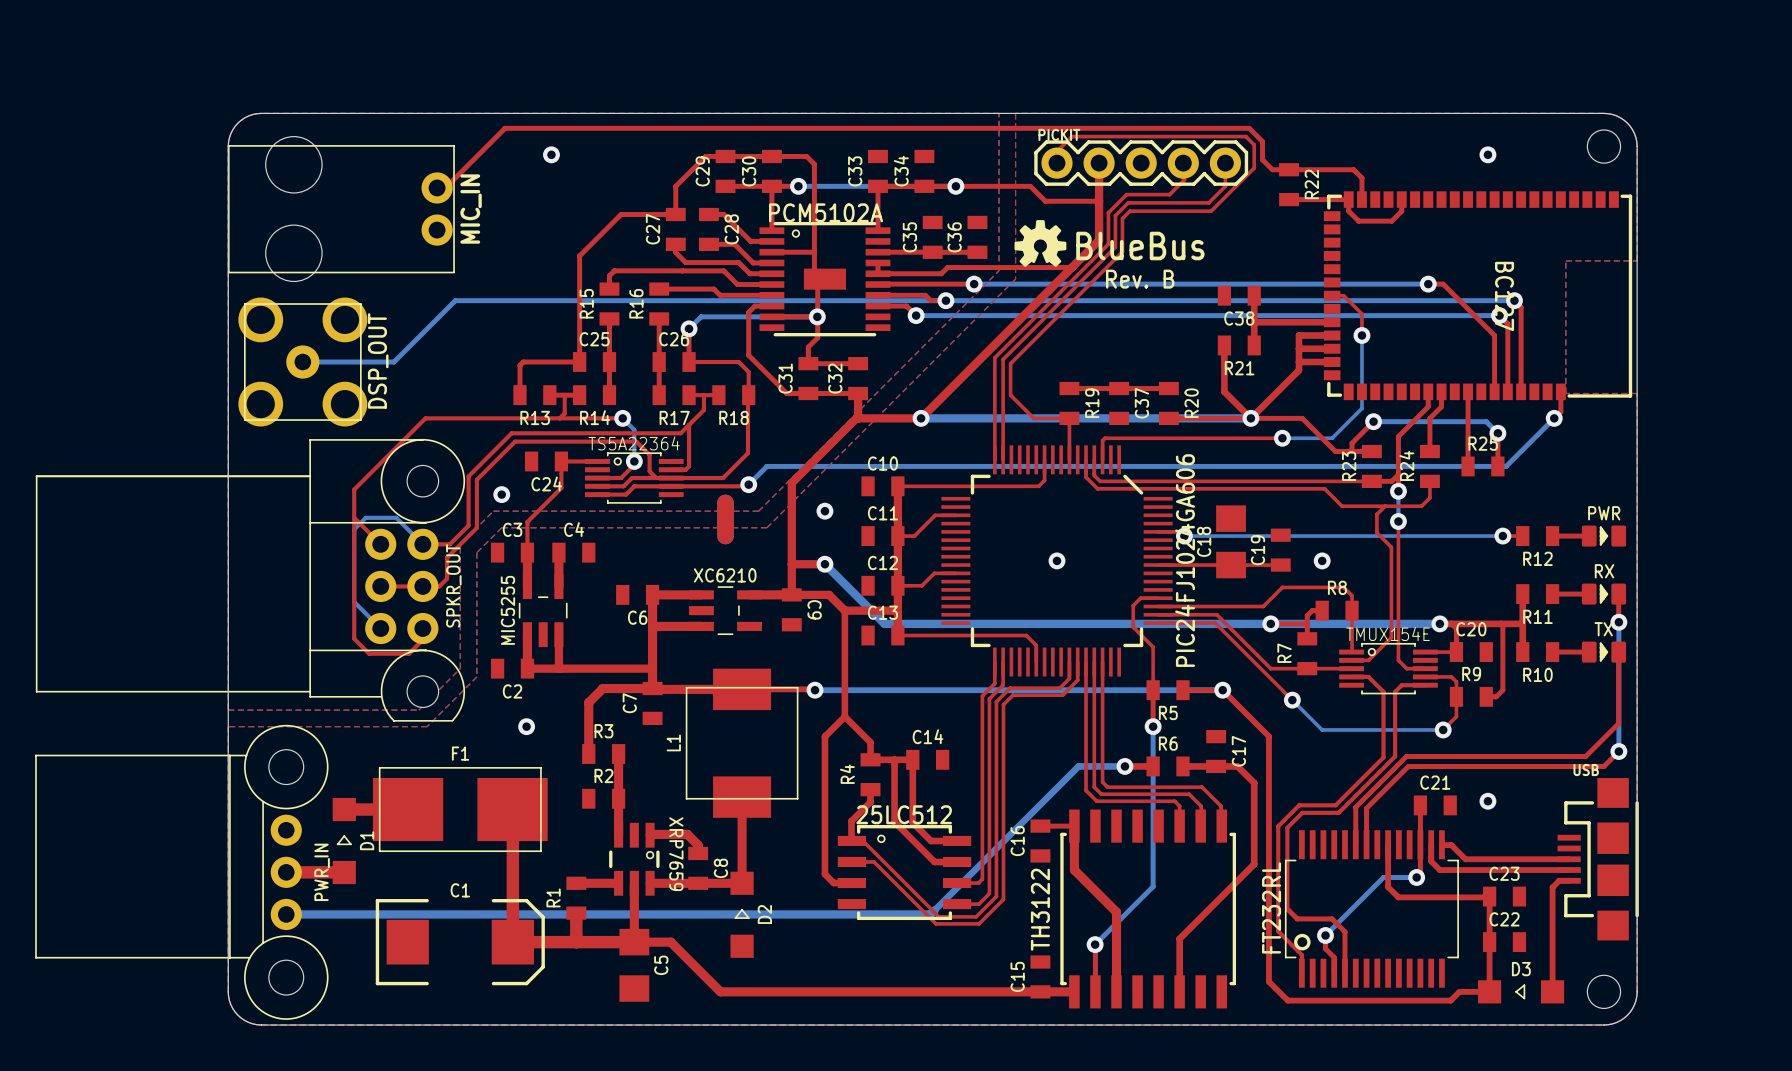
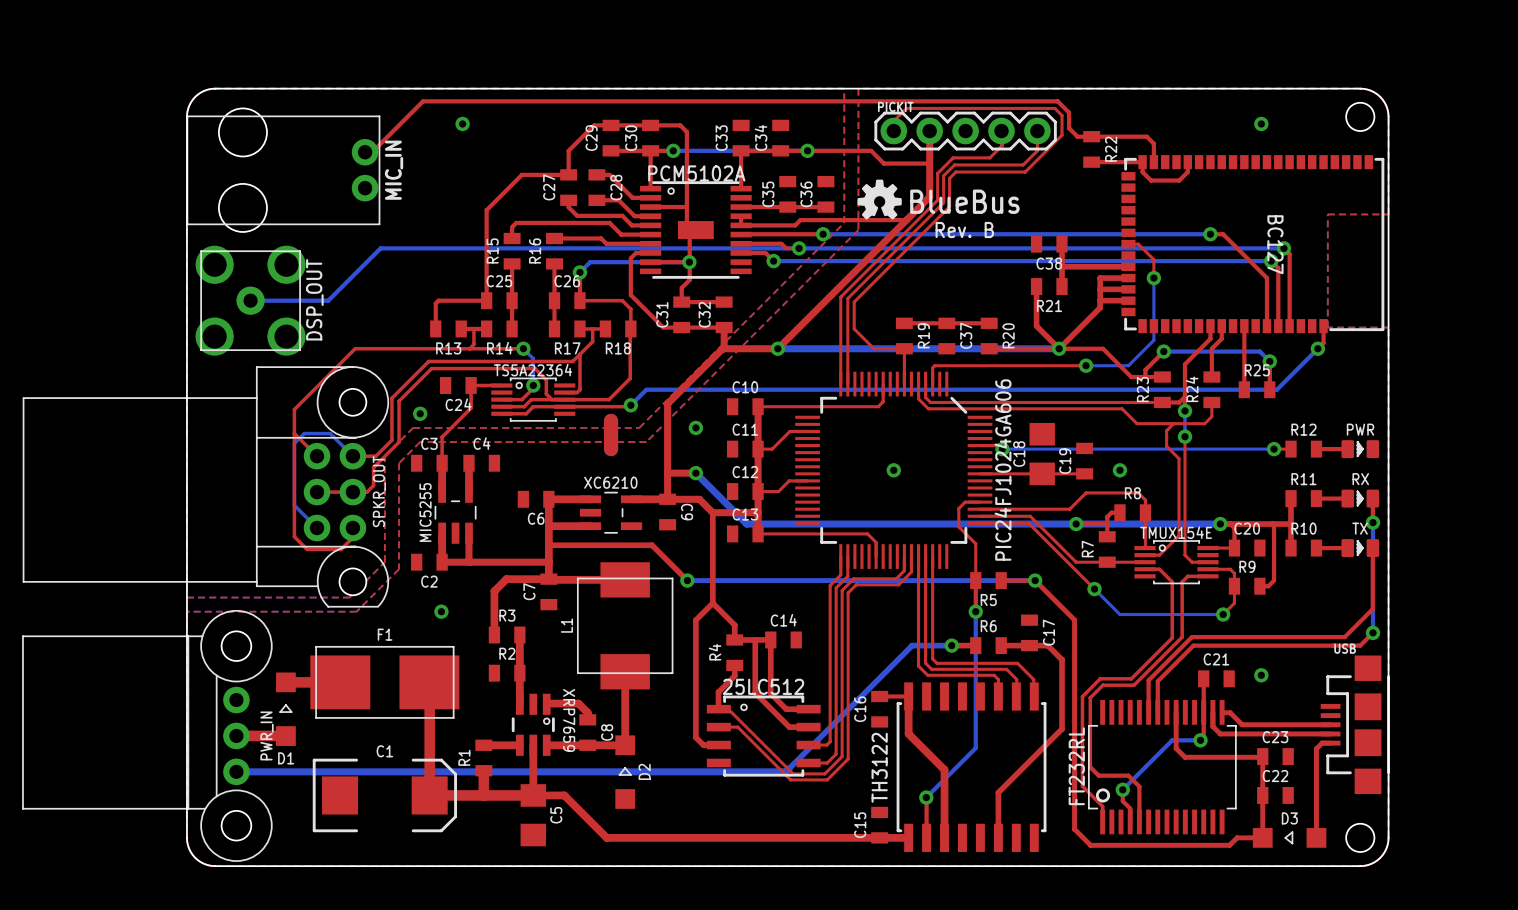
R12 name position: R12 (1537, 558) -> R12 (1303, 429)
R11 name position: R11 (1537, 616) -> R11 (1303, 479)
R10 name position: R10 (1537, 674) -> R10 (1303, 528)
top track: (742, 689) (814, 689) -> (548, 543) (652, 545) (686, 579)
D1 name rotation: 0° (367, 840) -> 90° clockwise (286, 758)
D1 name position: D1 (367, 840) -> D1 (286, 758)

